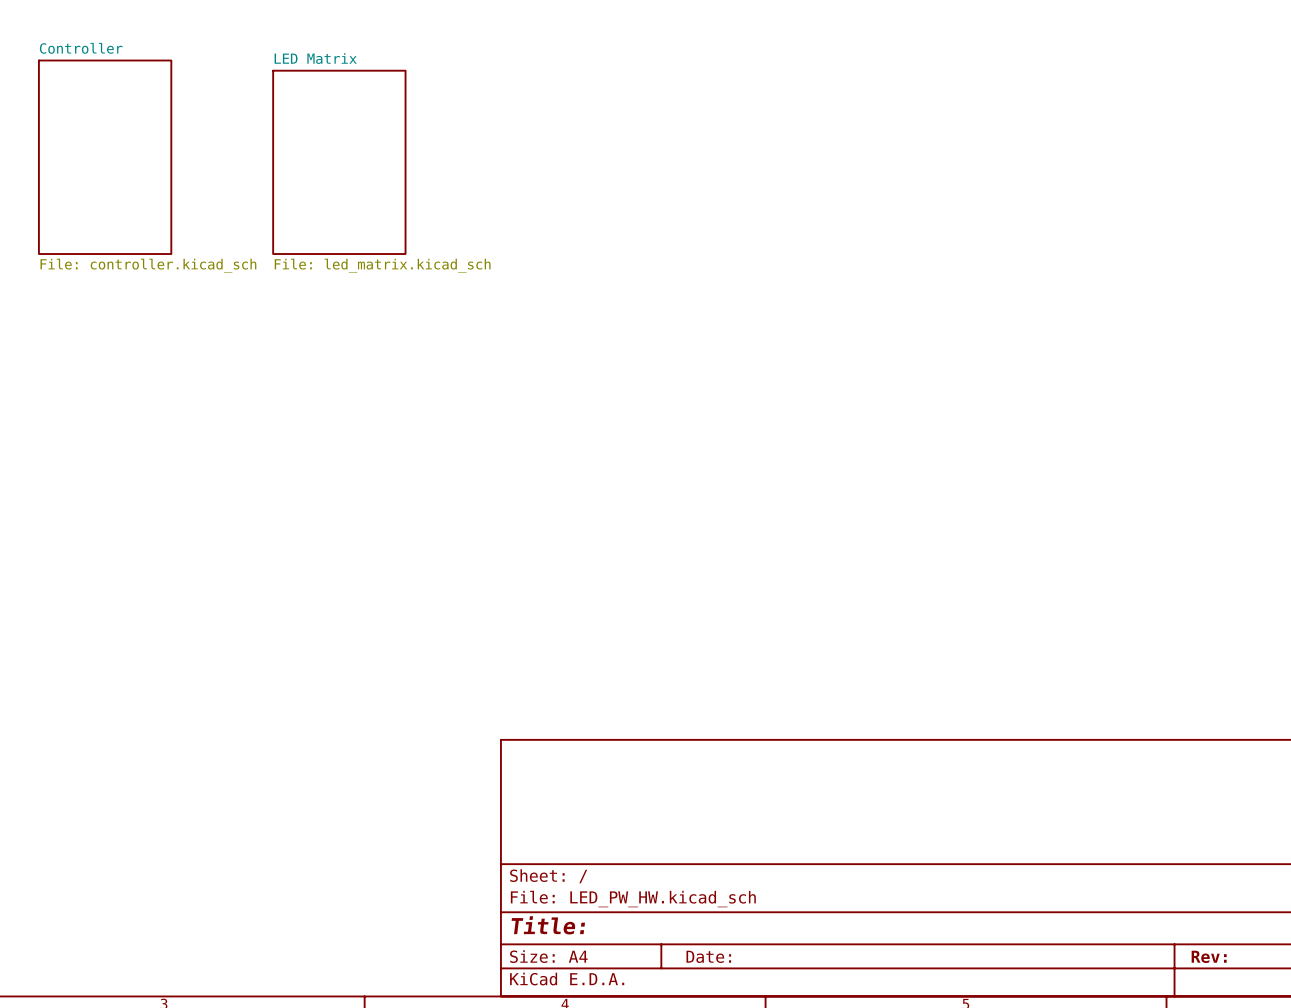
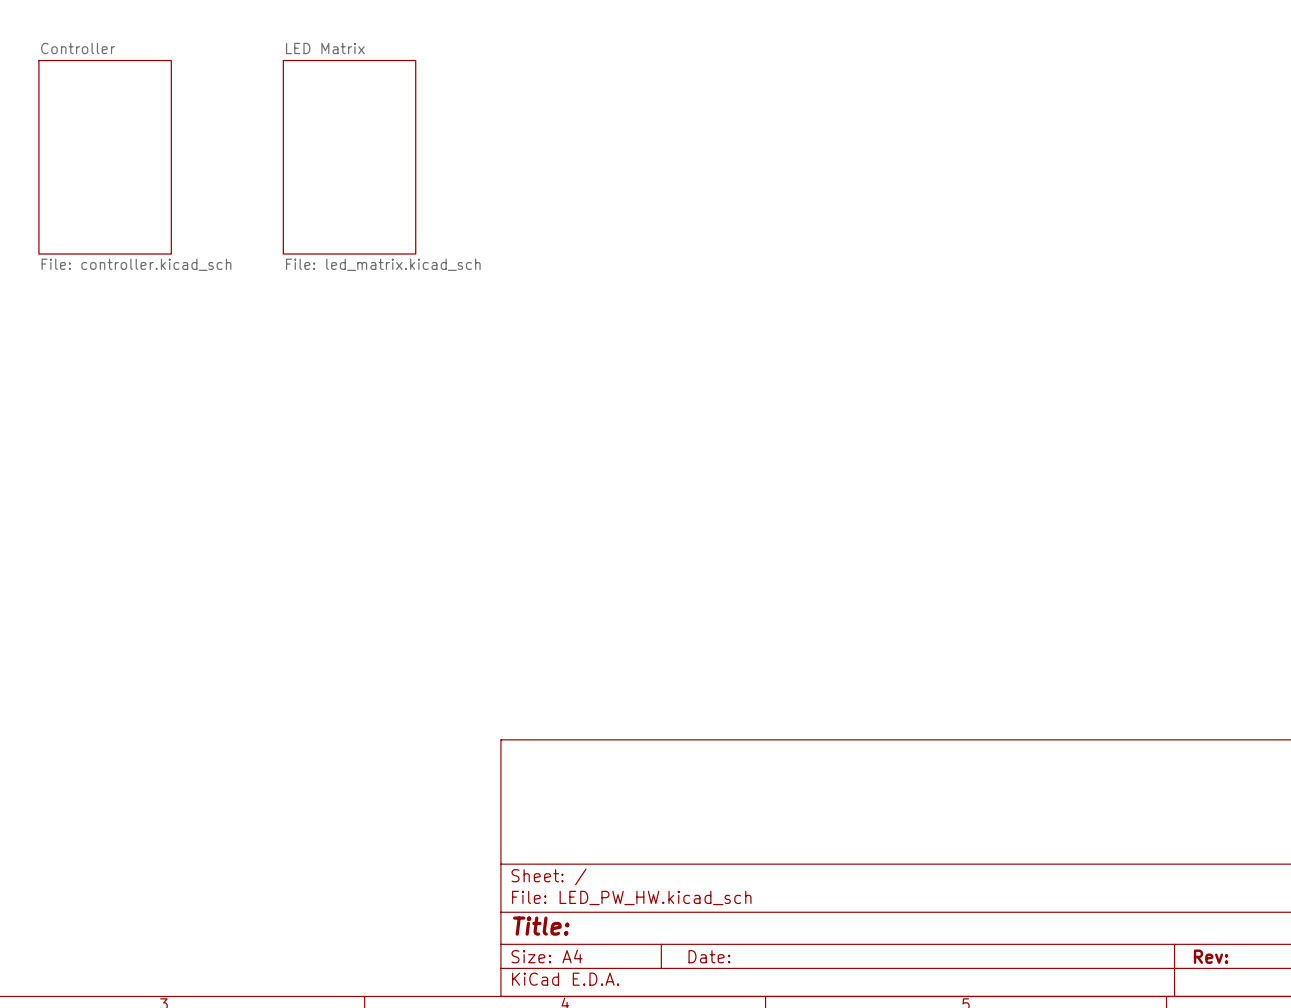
sheet LED Matrix: none -> File: led_matrix.kicad_sch (349, 157)
sheet LED Matrix: File: led_matrix.kicad_sch (339, 162) -> none

